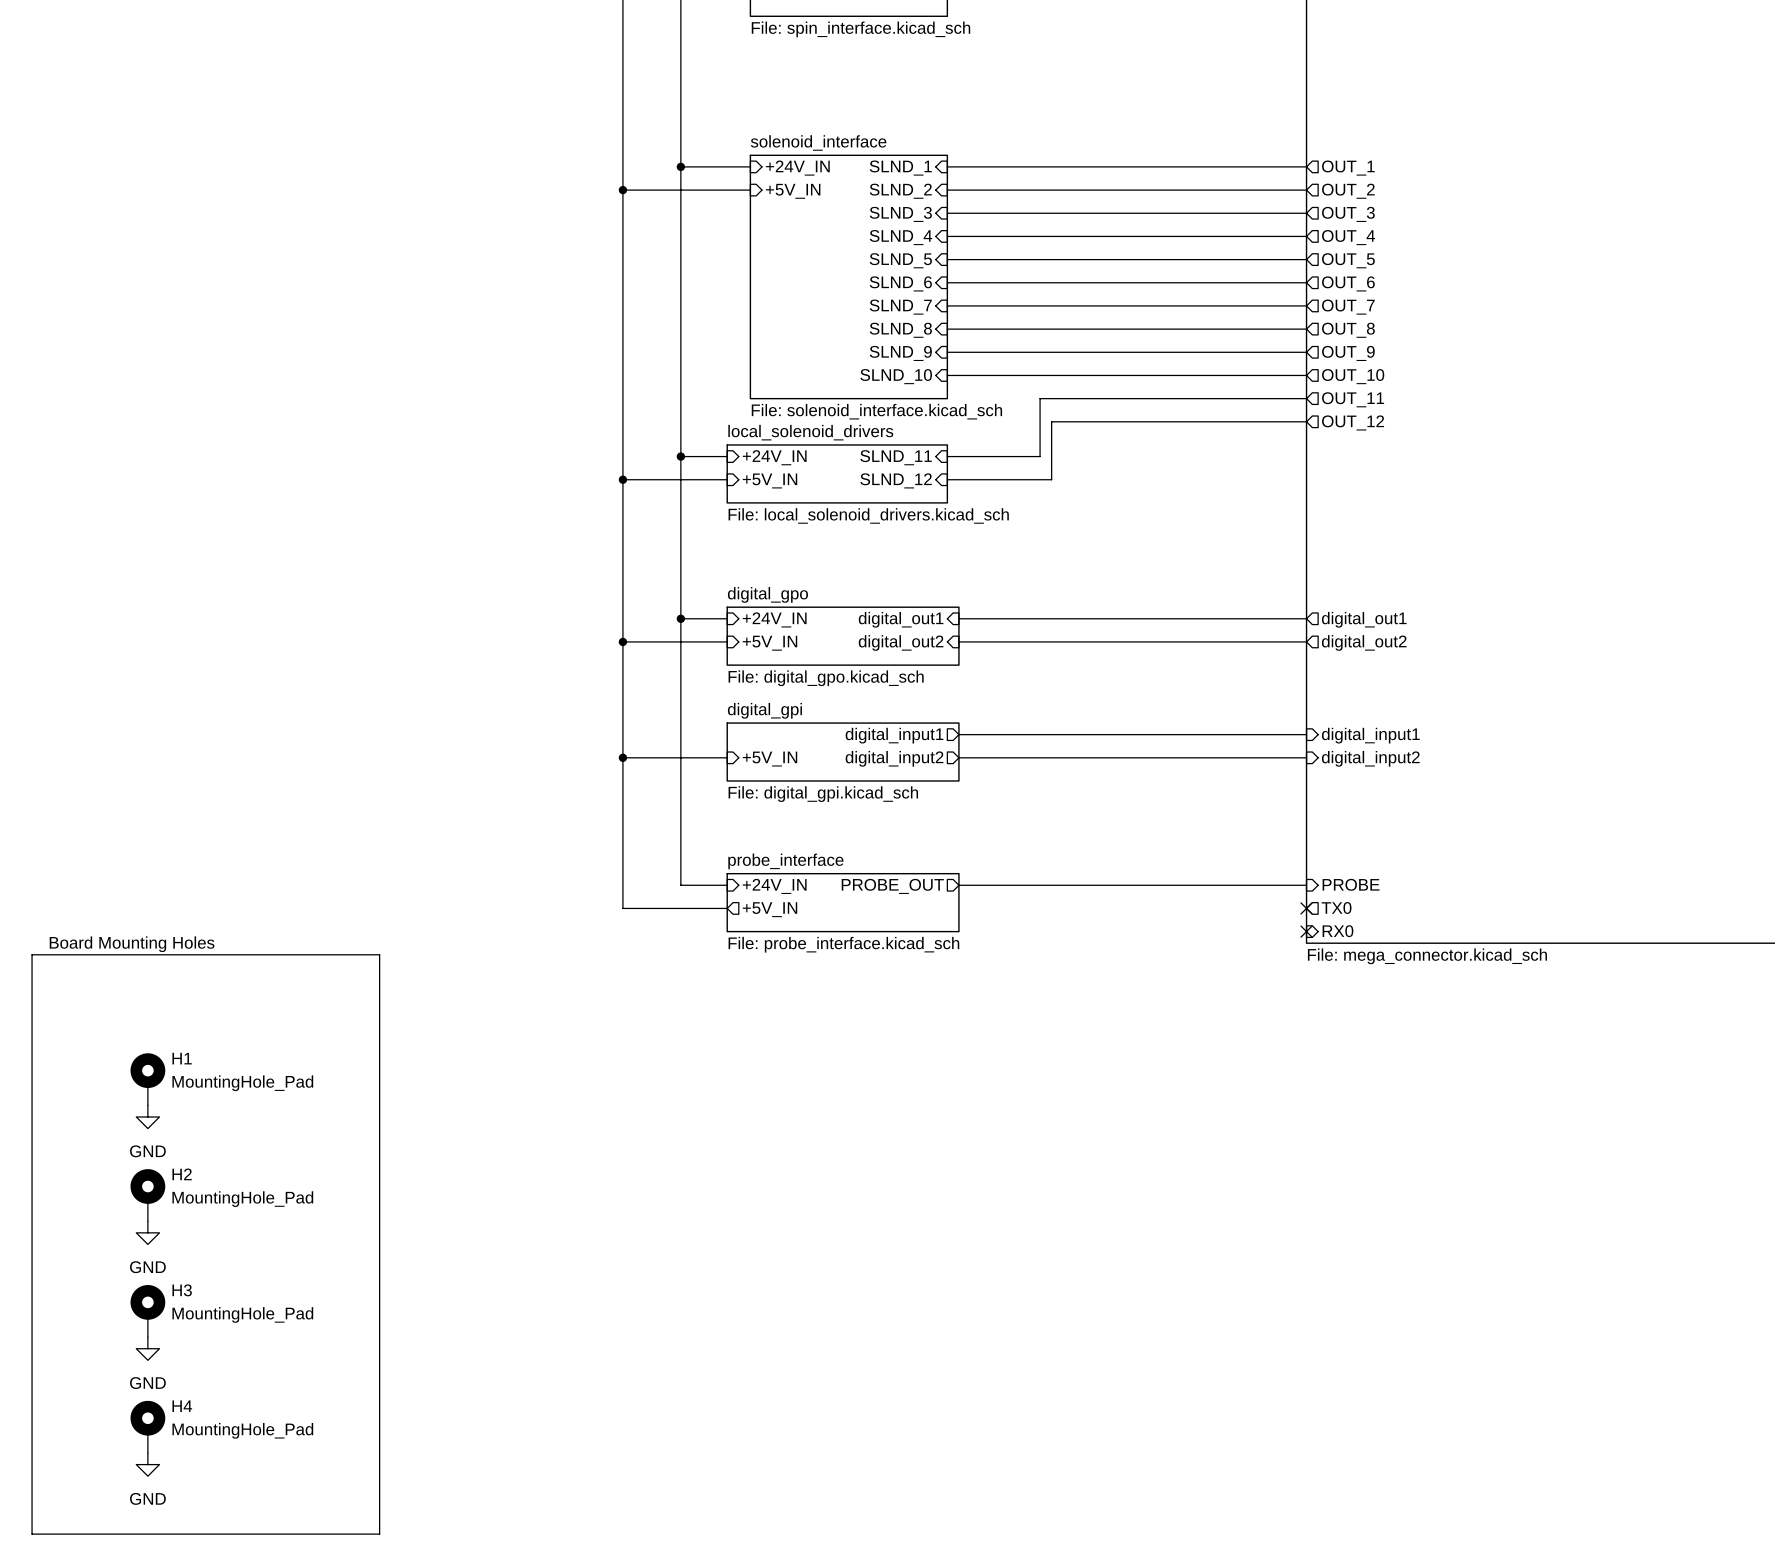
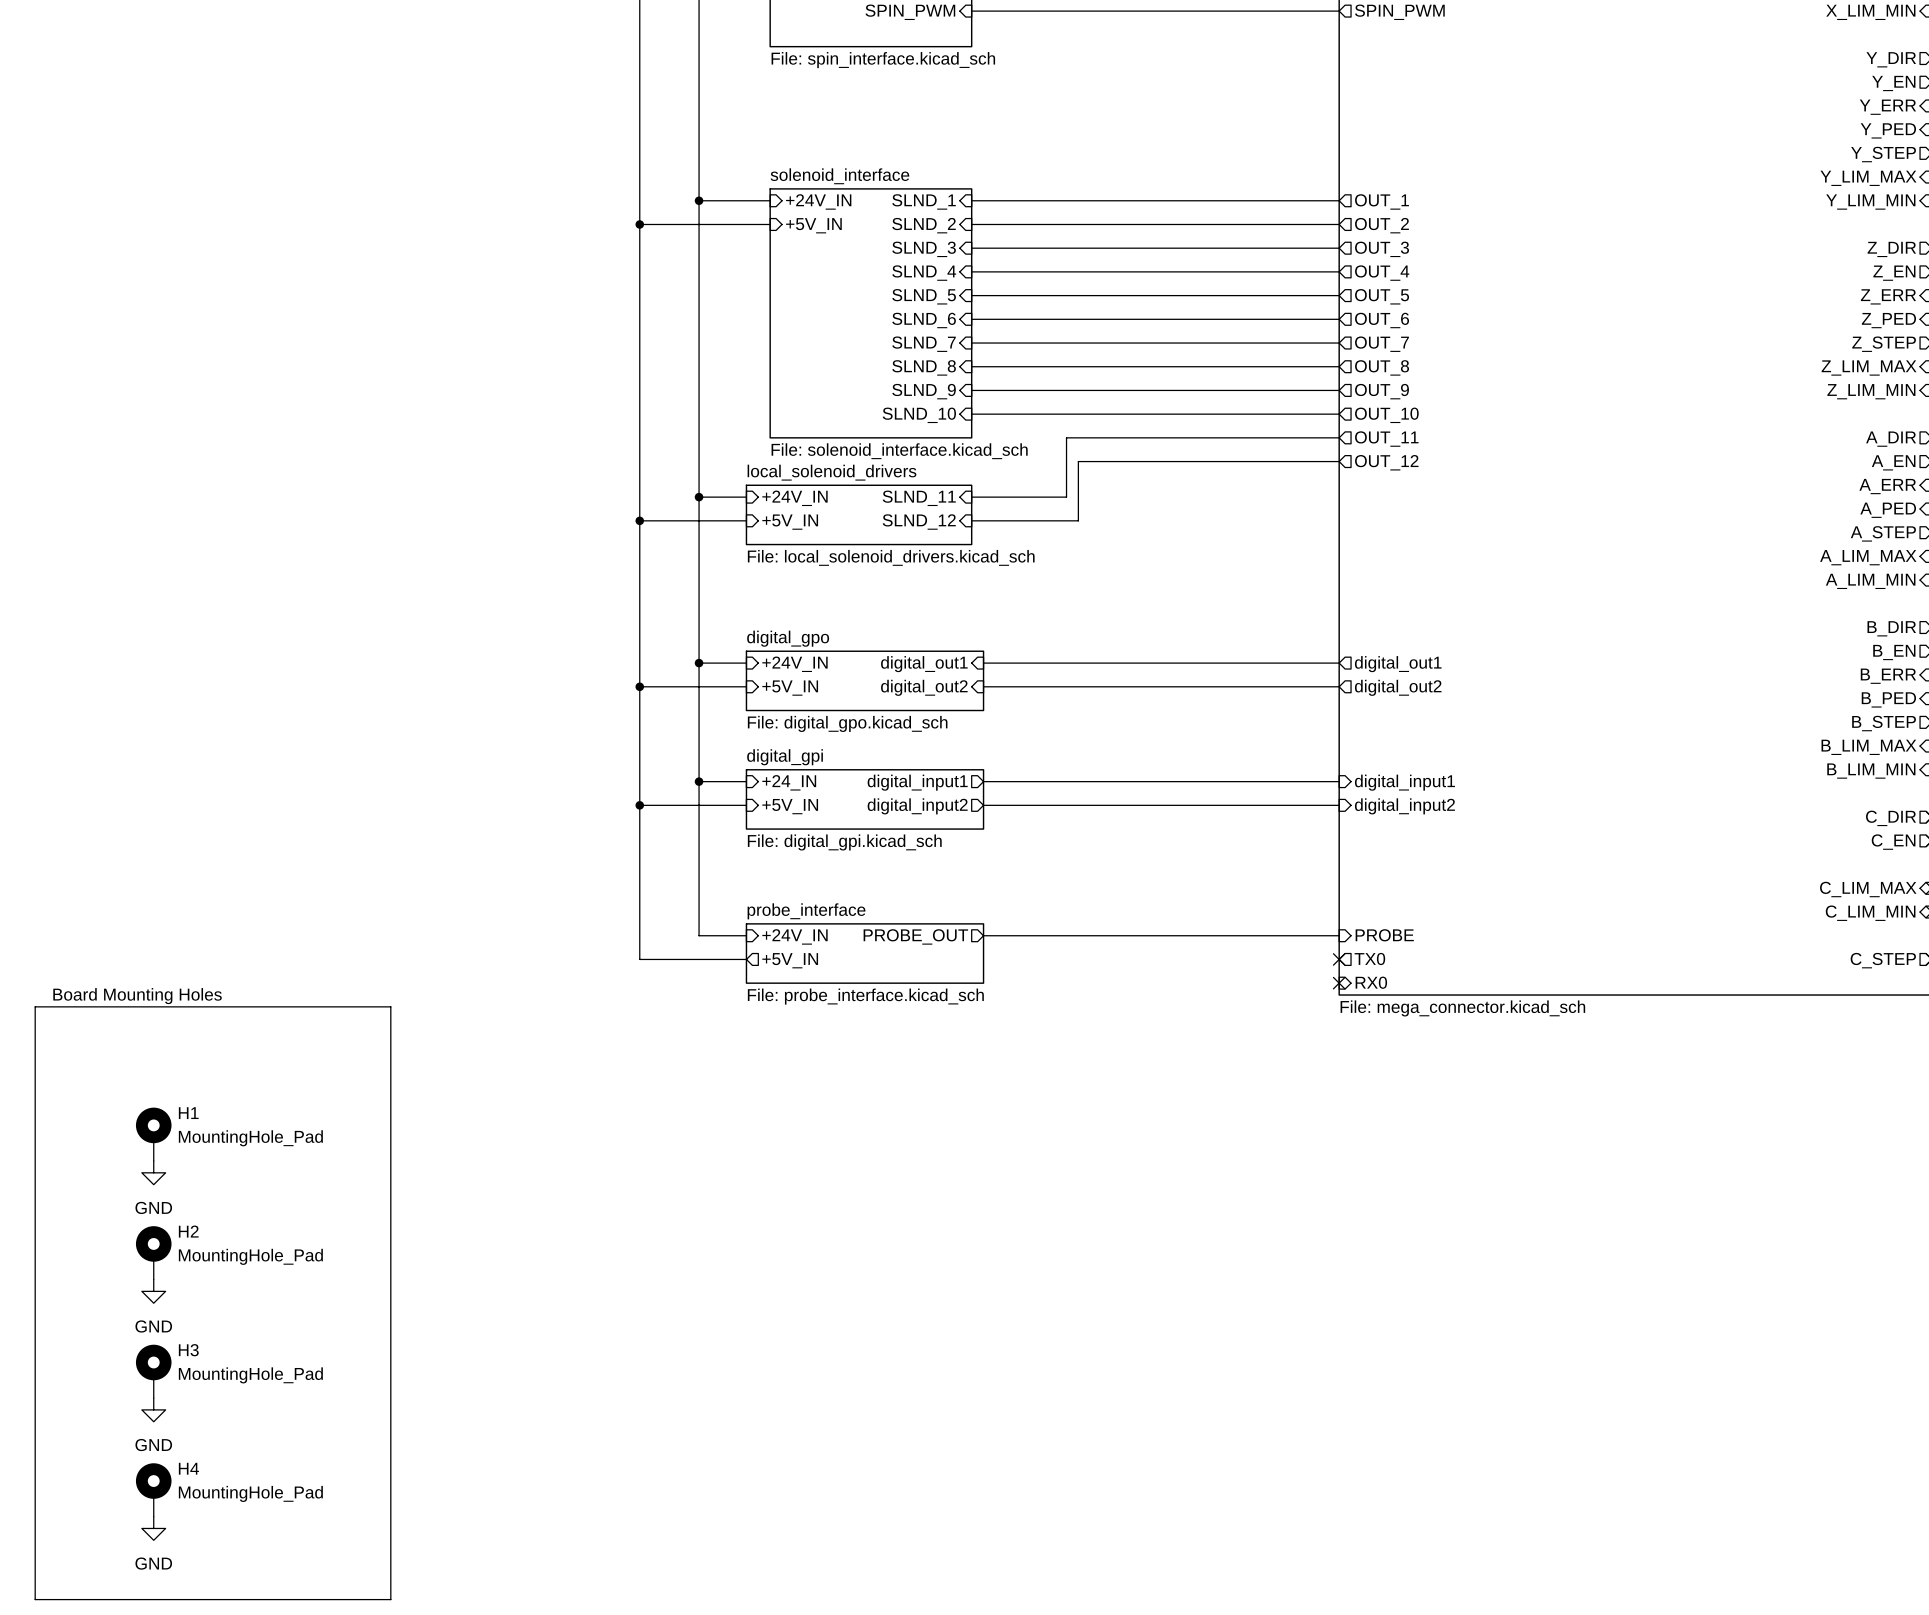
wire: none -> (699, 781) (746, 781)
junction: none -> (699, 781)
sheet pin: none -> +24_IN (789, 782)

